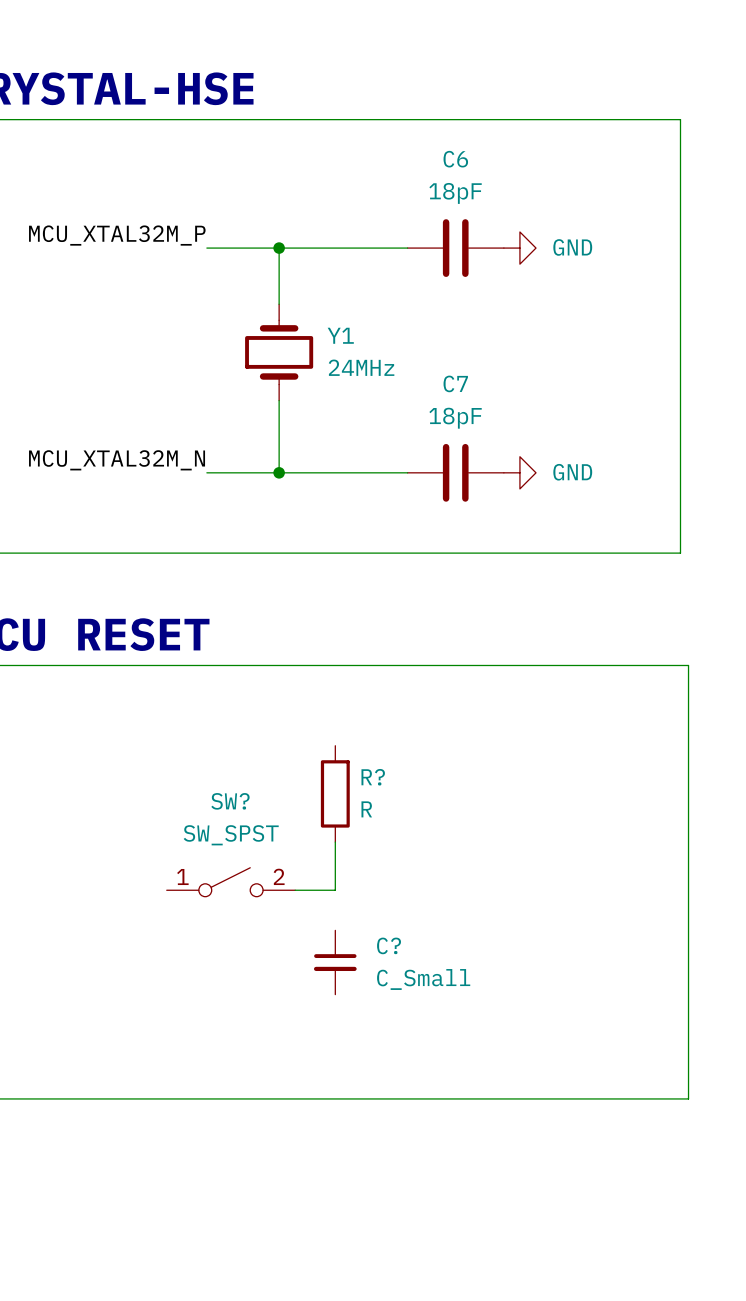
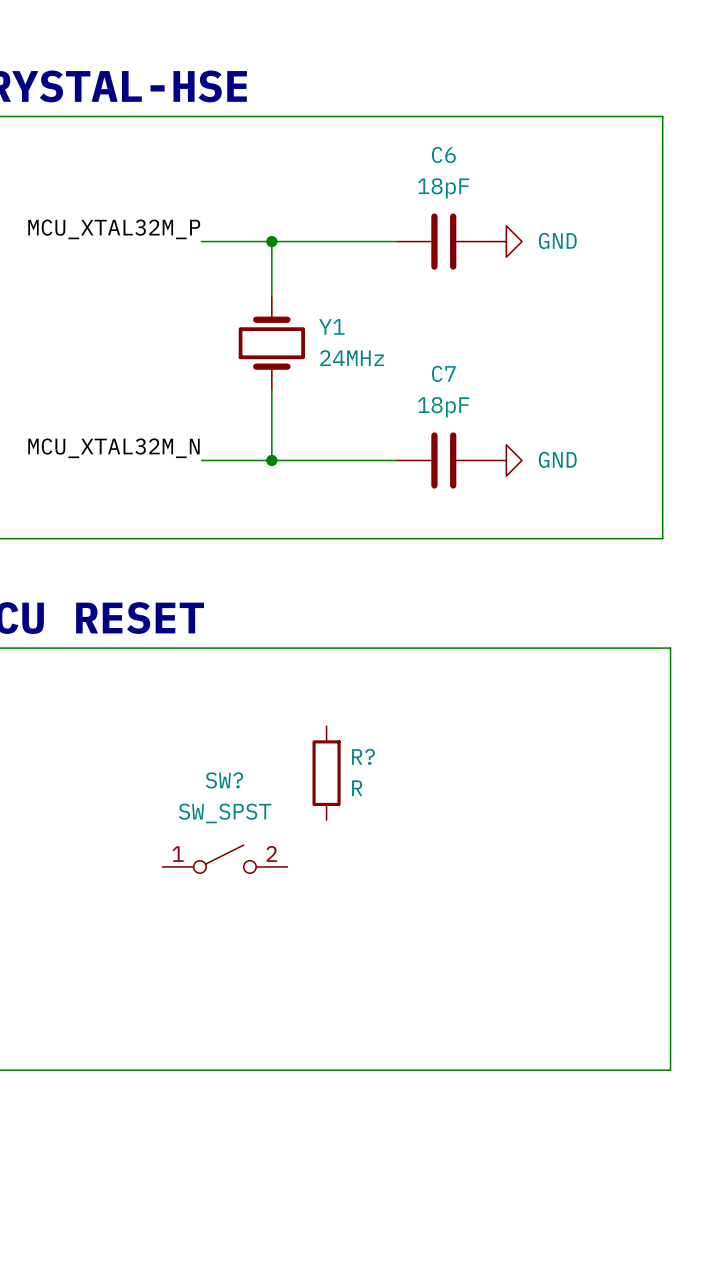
wire: (335, 842) (335, 890) (295, 890) -> none
C?: C_Small (335, 962) -> none

